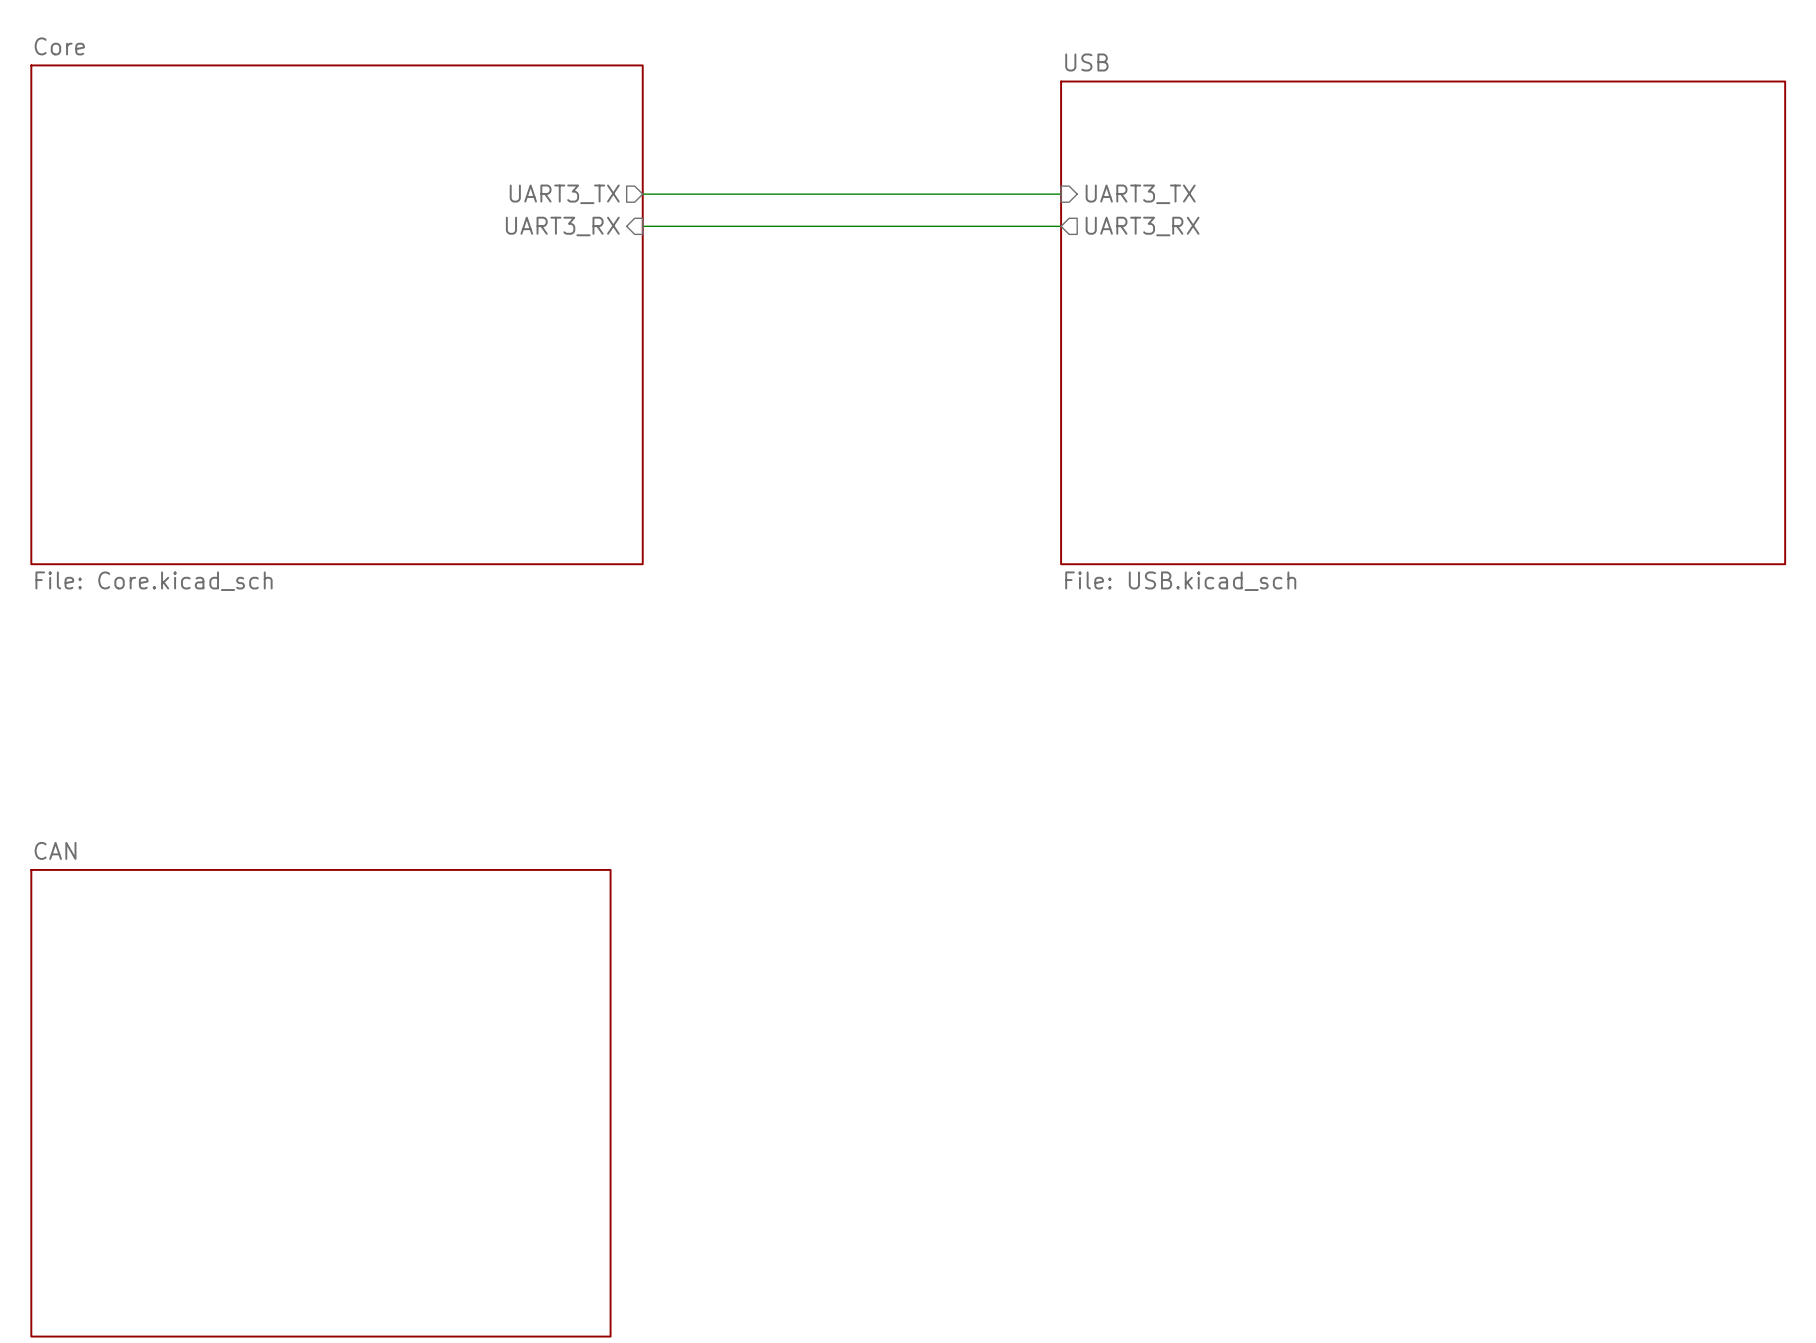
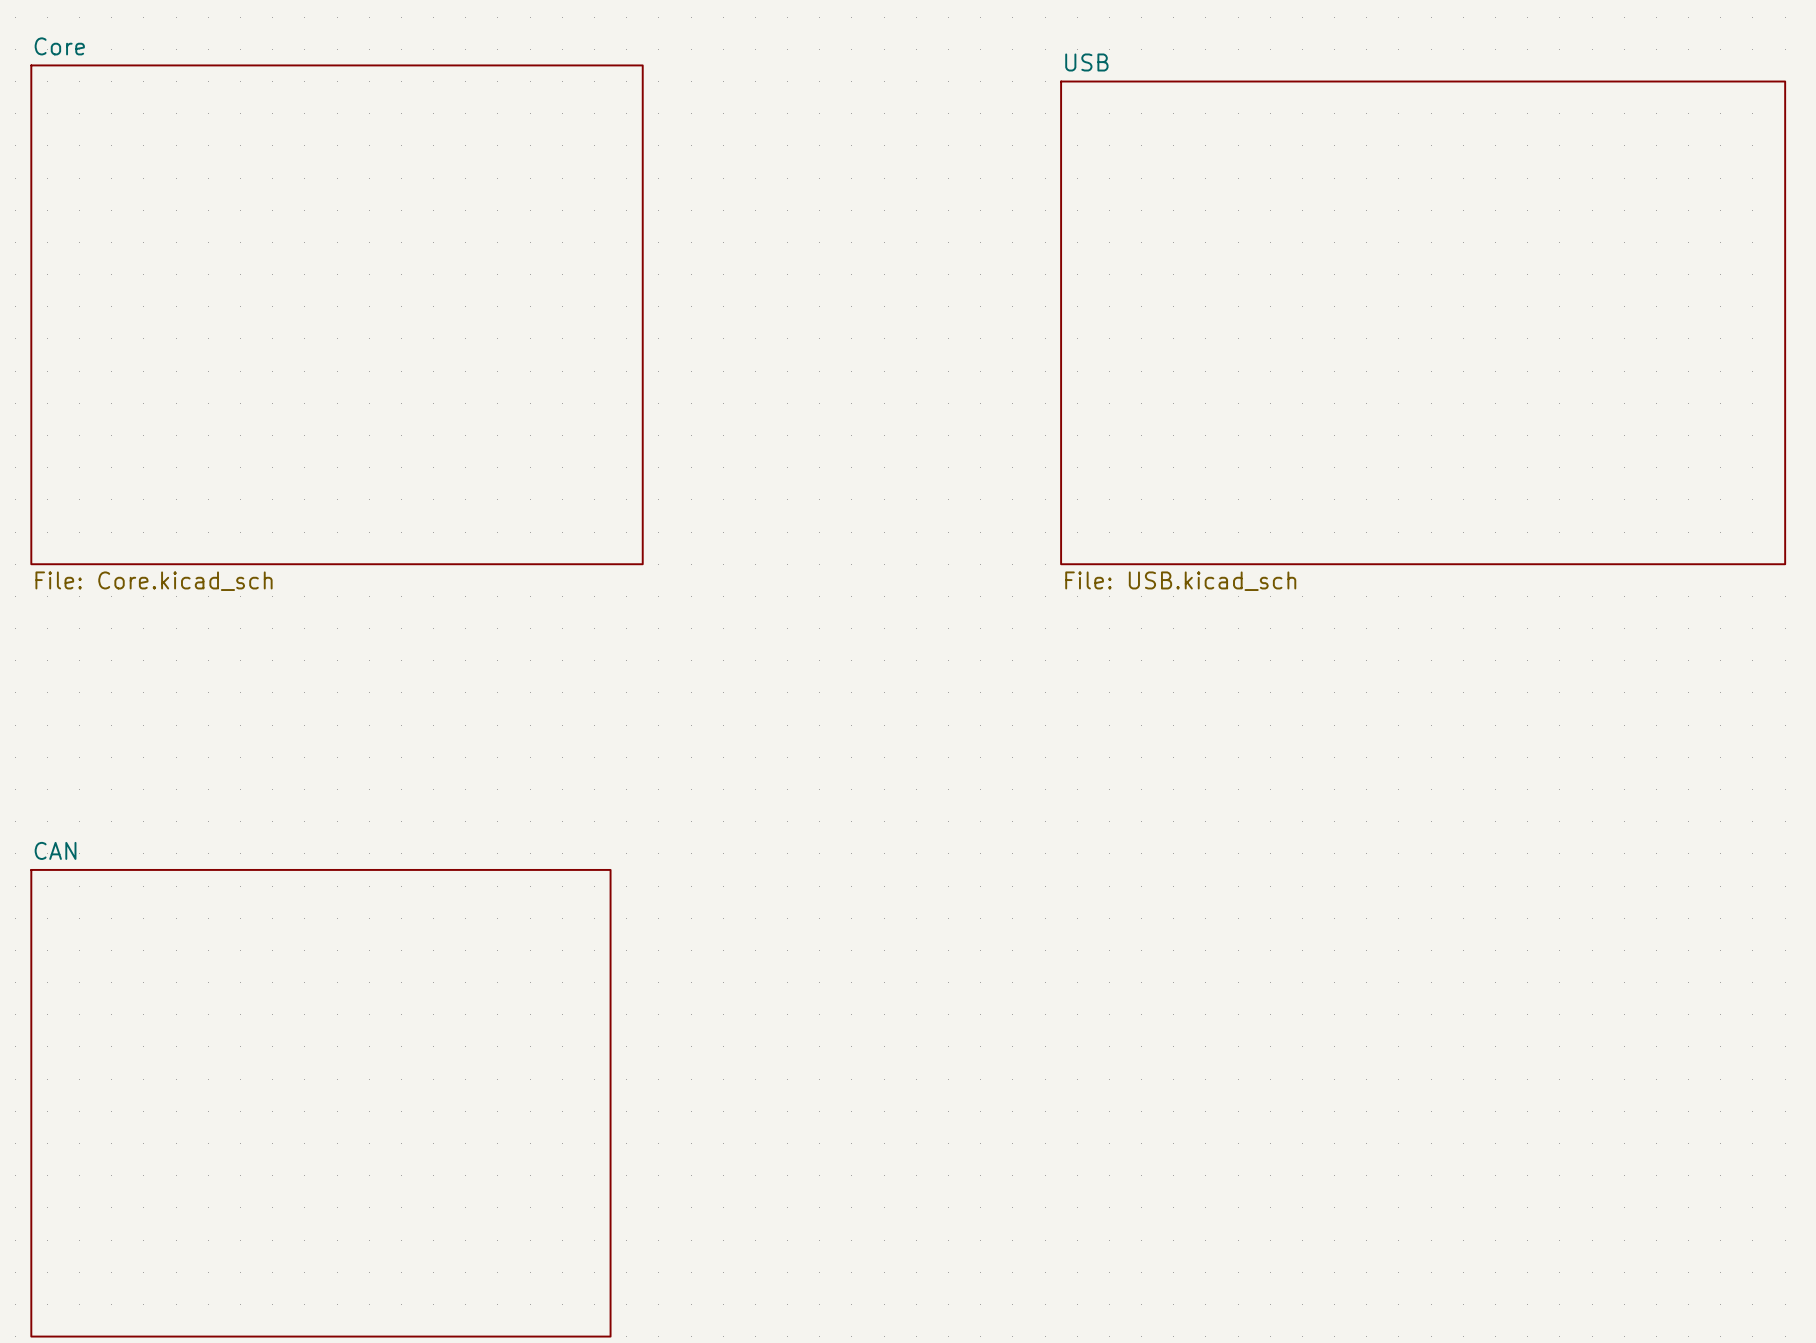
sheet pin: UART3_TX (564, 194) -> none
wire: (642, 194) (1061, 194) -> none
sheet pin: UART3_TX (1140, 194) -> none
sheet pin: UART3_RX (562, 226) -> none
wire: (642, 226) (1061, 226) -> none
sheet pin: UART3_RX (1142, 226) -> none

